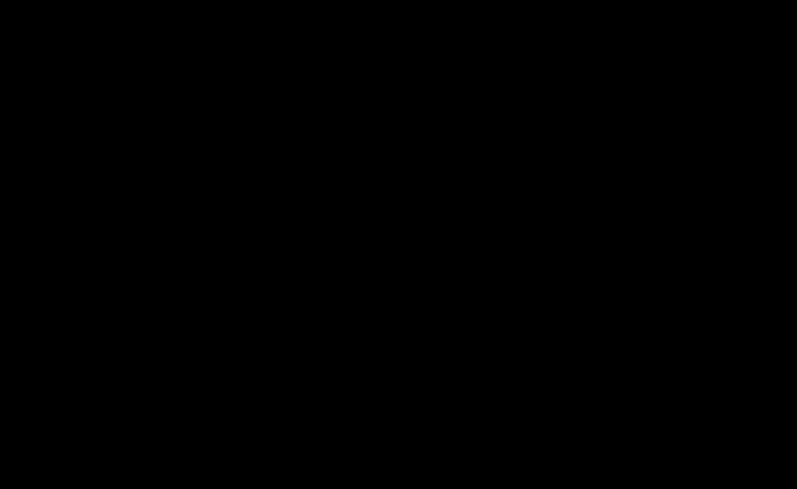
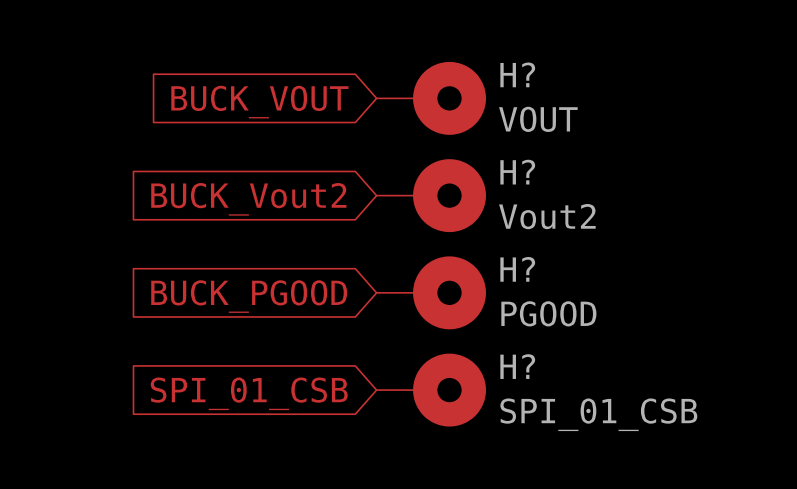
H?: none -> VOUT (431, 98)
global label: none -> BUCK_VOUT (259, 102)
H?: none -> Vout2 (431, 195)
global label: none -> BUCK_Vout2 (248, 199)
H?: none -> PGOOD (431, 292)
global label: none -> BUCK_PGOOD (249, 296)
H?: none -> SPI_01_CSB (431, 390)
global label: none -> SPI_01_CSB (249, 393)

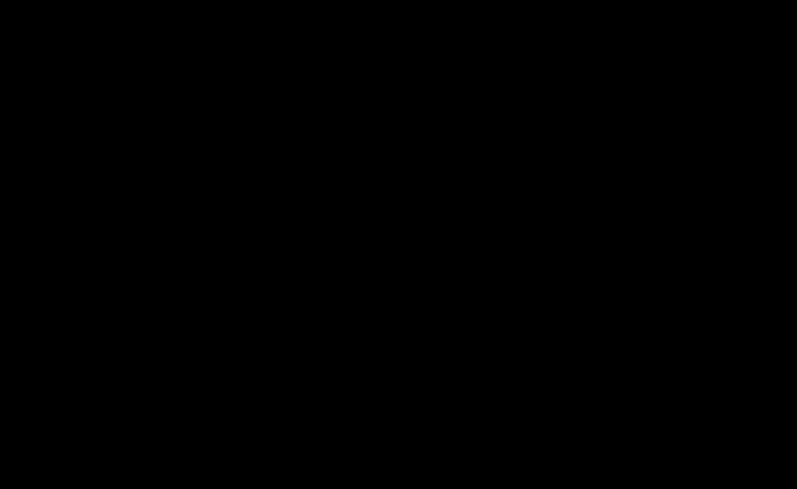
H?: VOUT (431, 98) -> none
global label: BUCK_VOUT (259, 102) -> none
H?: Vout2 (431, 195) -> none
global label: BUCK_Vout2 (248, 199) -> none
H?: PGOOD (431, 292) -> none
global label: BUCK_PGOOD (249, 296) -> none
H?: SPI_01_CSB (431, 390) -> none
global label: SPI_01_CSB (249, 393) -> none

